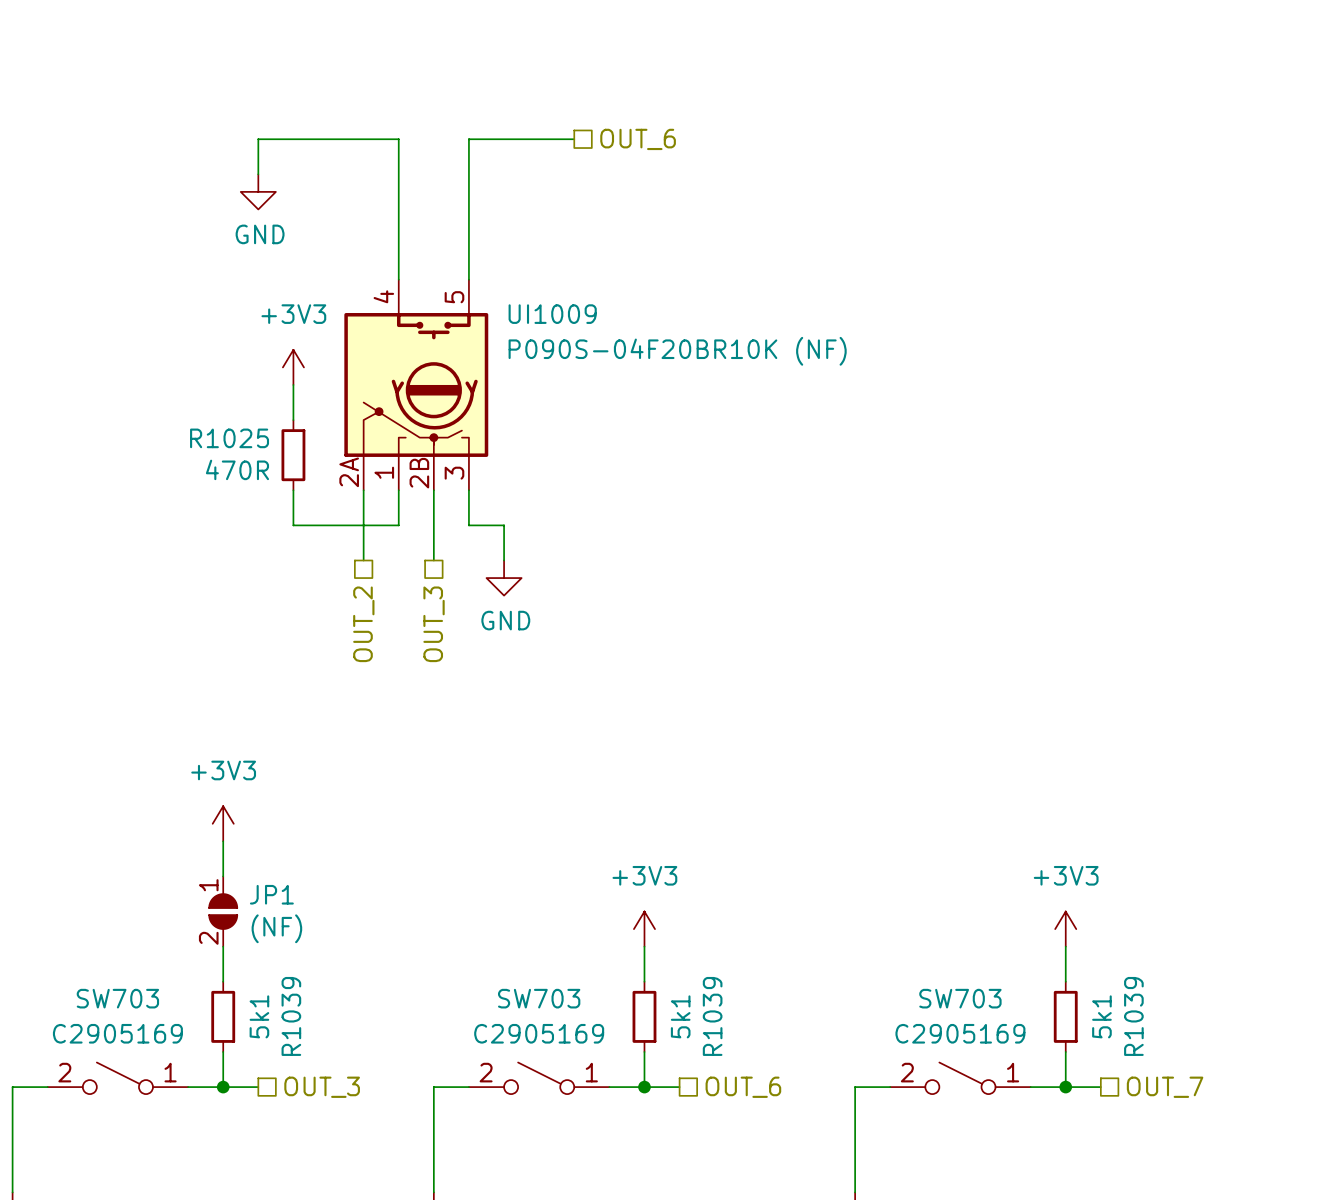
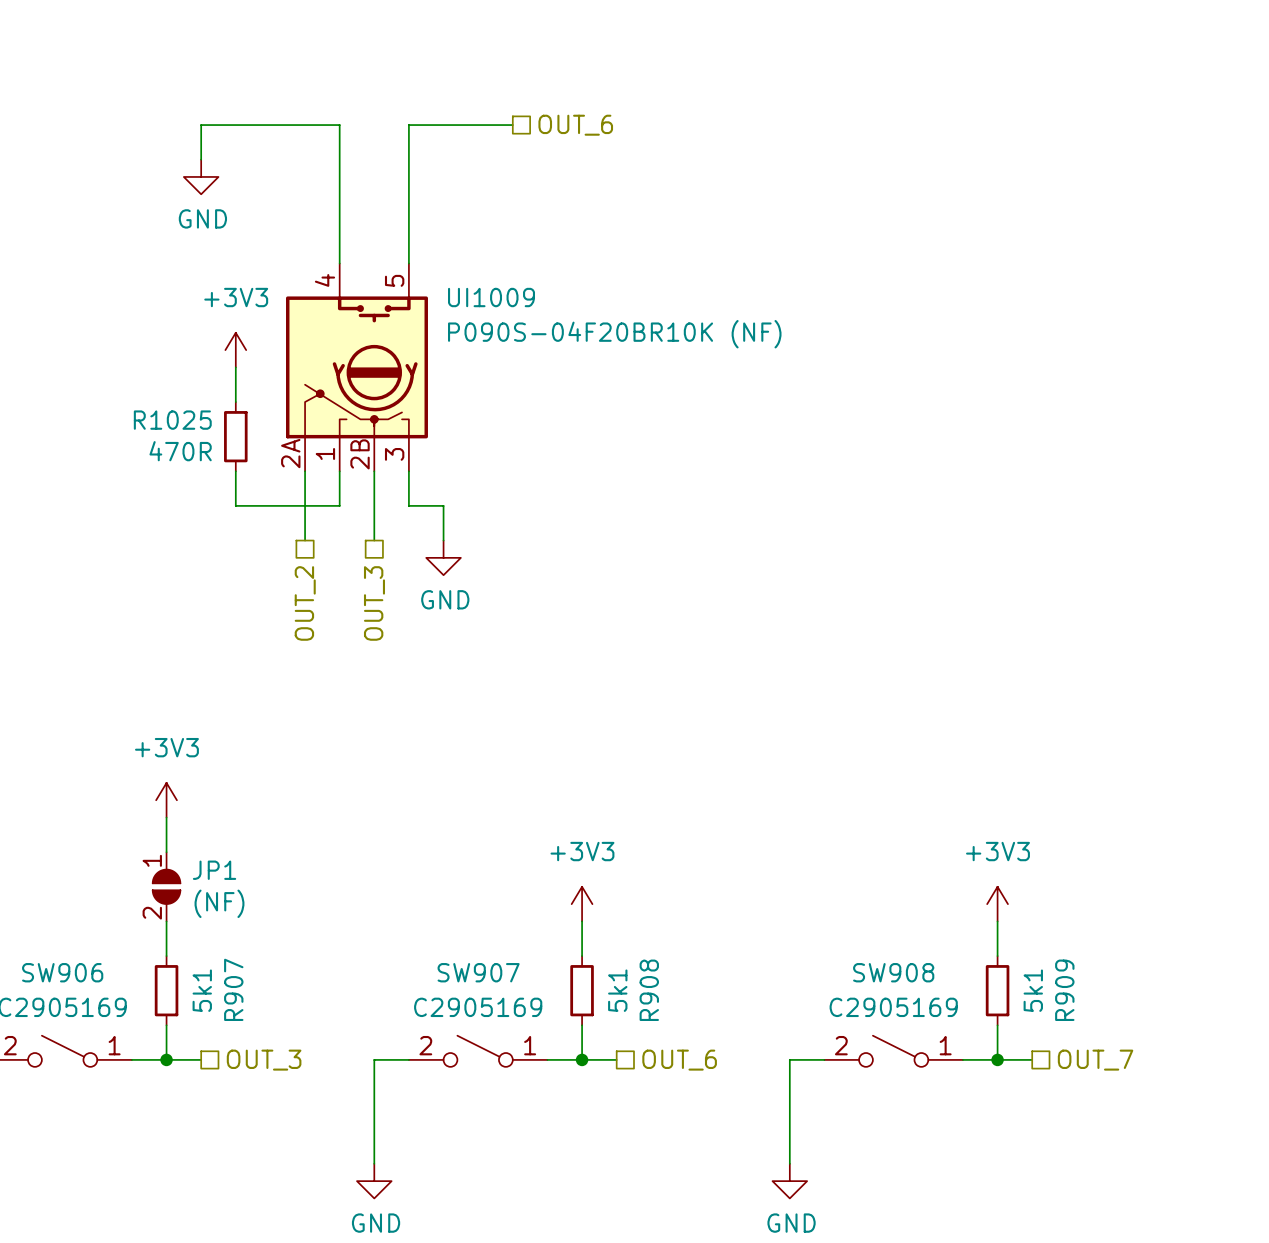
SW703 name: SW703 (117, 998) -> SW906 (62, 972)
SW703 name: SW703 (539, 998) -> SW907 (478, 972)
SW703 name: SW703 (960, 998) -> SW908 (893, 972)
R1039 name: R1039 (291, 1016) -> R907 (233, 989)
R1039 name: R1039 (712, 1016) -> R908 (649, 990)
R1039 name: R1039 (1133, 1016) -> R909 (1064, 990)

